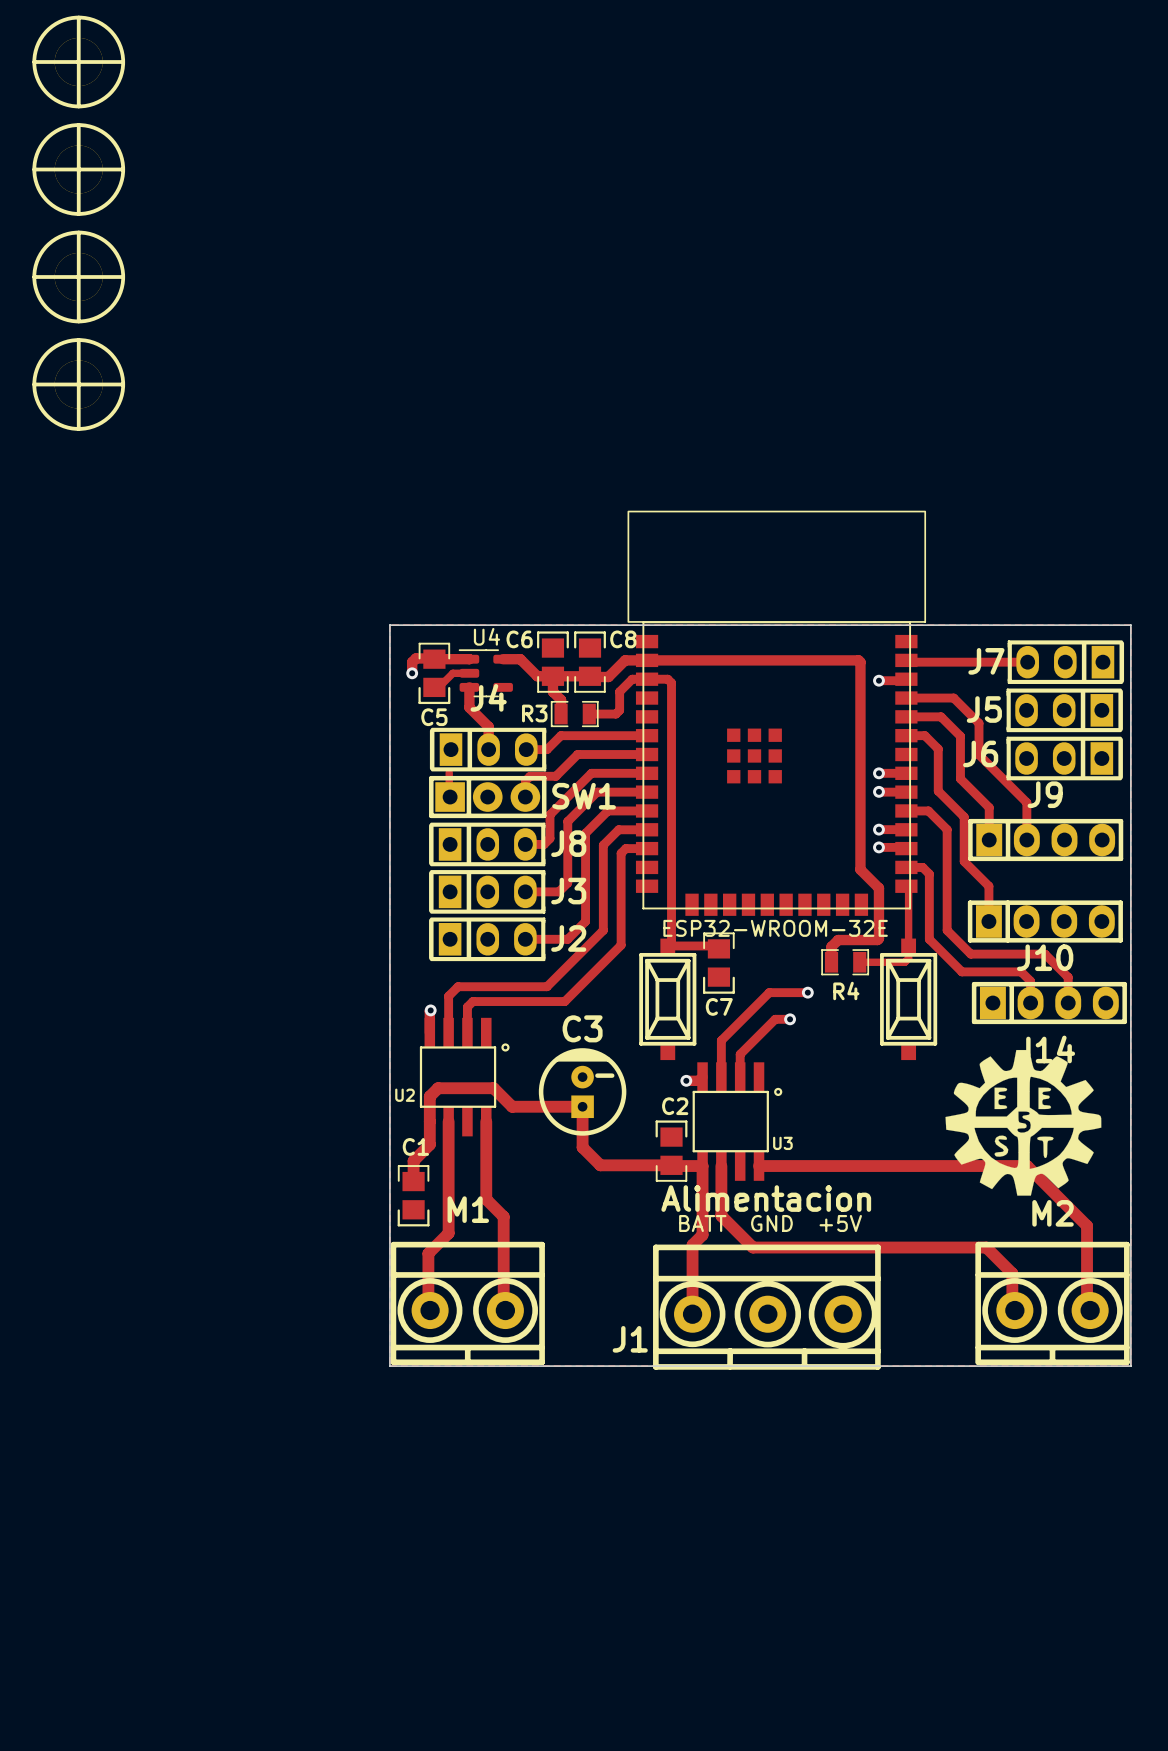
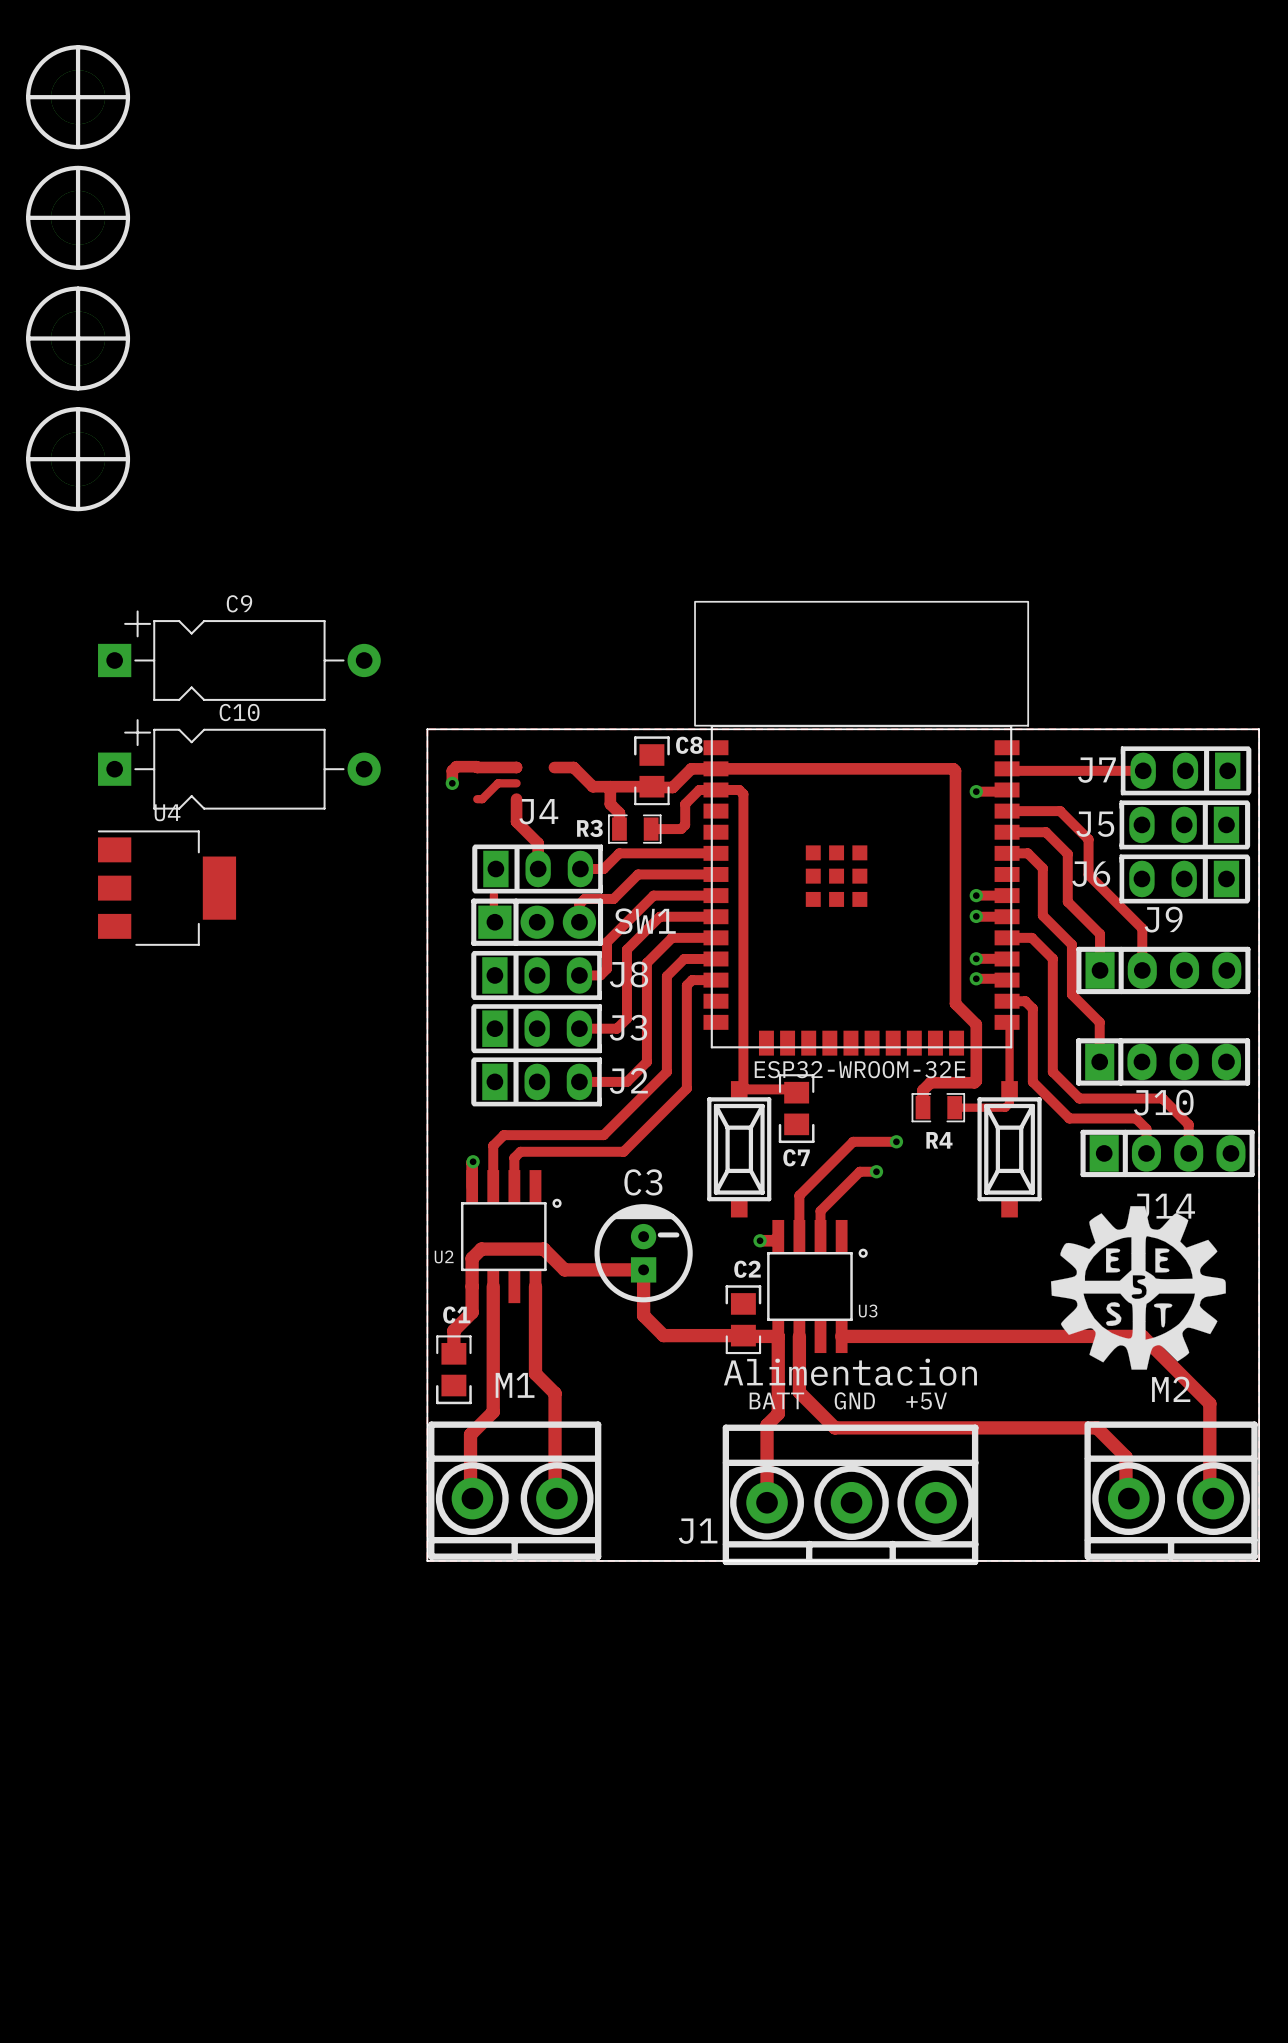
C9: none -> (239, 655)
U4 name position: U4 (486, 636) -> U4 (167, 812)
U4 footprint: [458, 649, 513, 698] -> [97, 830, 237, 946]
C10: none -> (239, 764)
C6: (552, 662) -> none
C5: (434, 673) -> none

